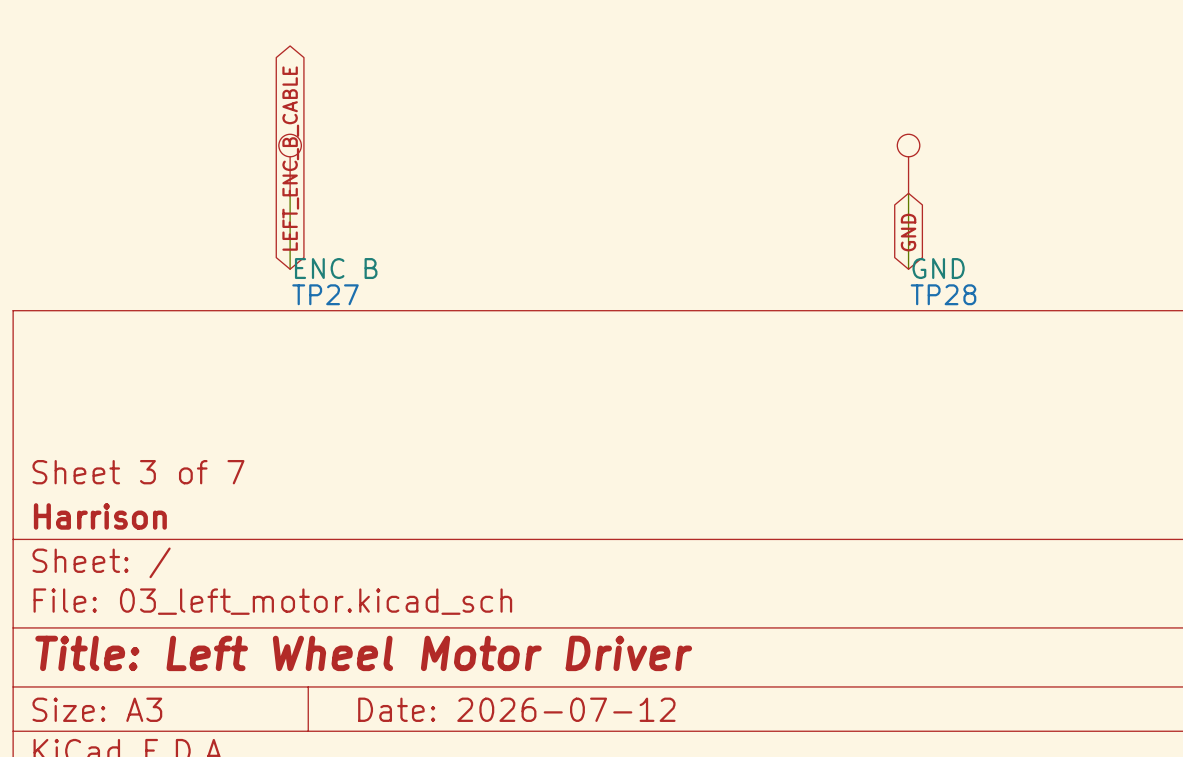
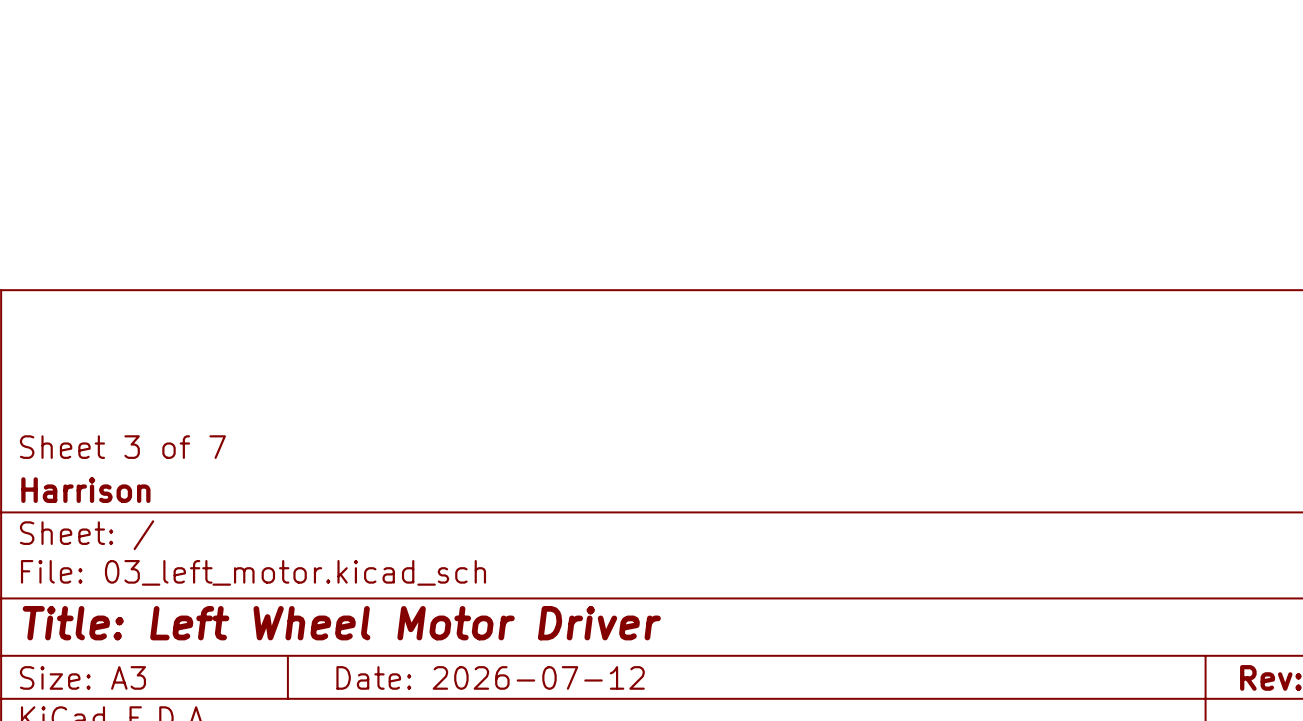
global label: LEFT_ENC_B_CABLE (290, 158) -> none
TP27: ENC B (290, 164) -> none
TP28: GND (908, 164) -> none
wire: (290, 194) (290, 269) -> none
wire: (908, 194) (908, 269) -> none
global label: GND (908, 232) -> none

